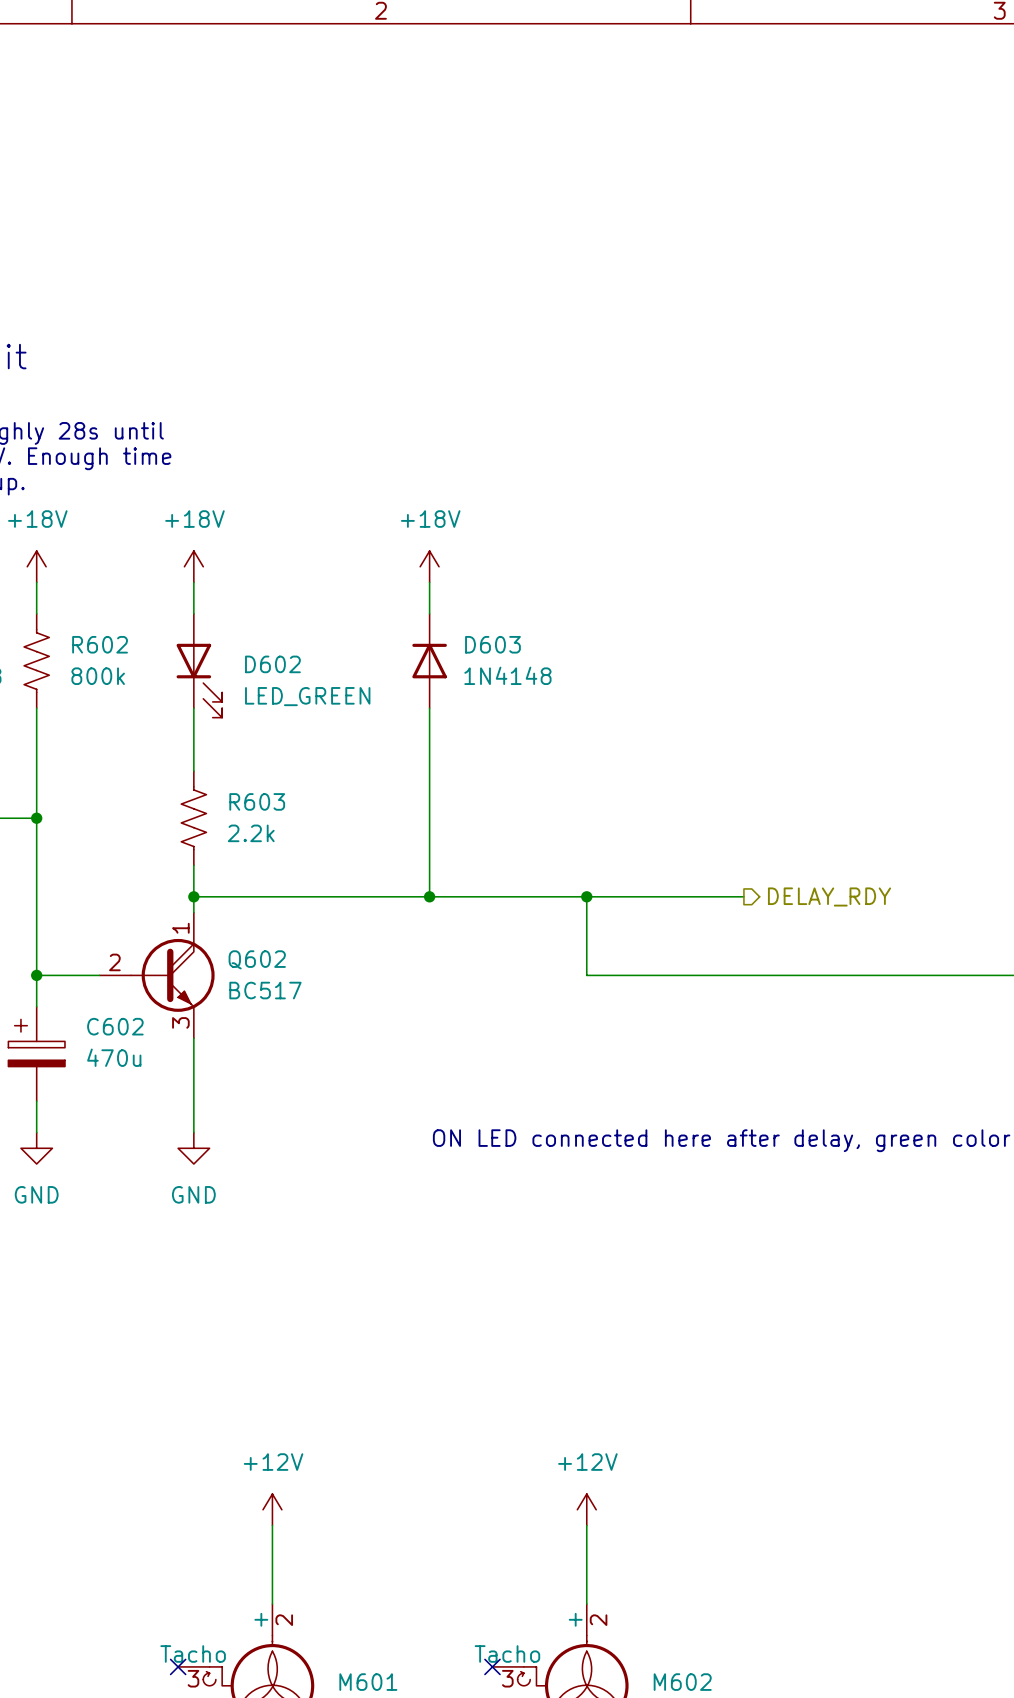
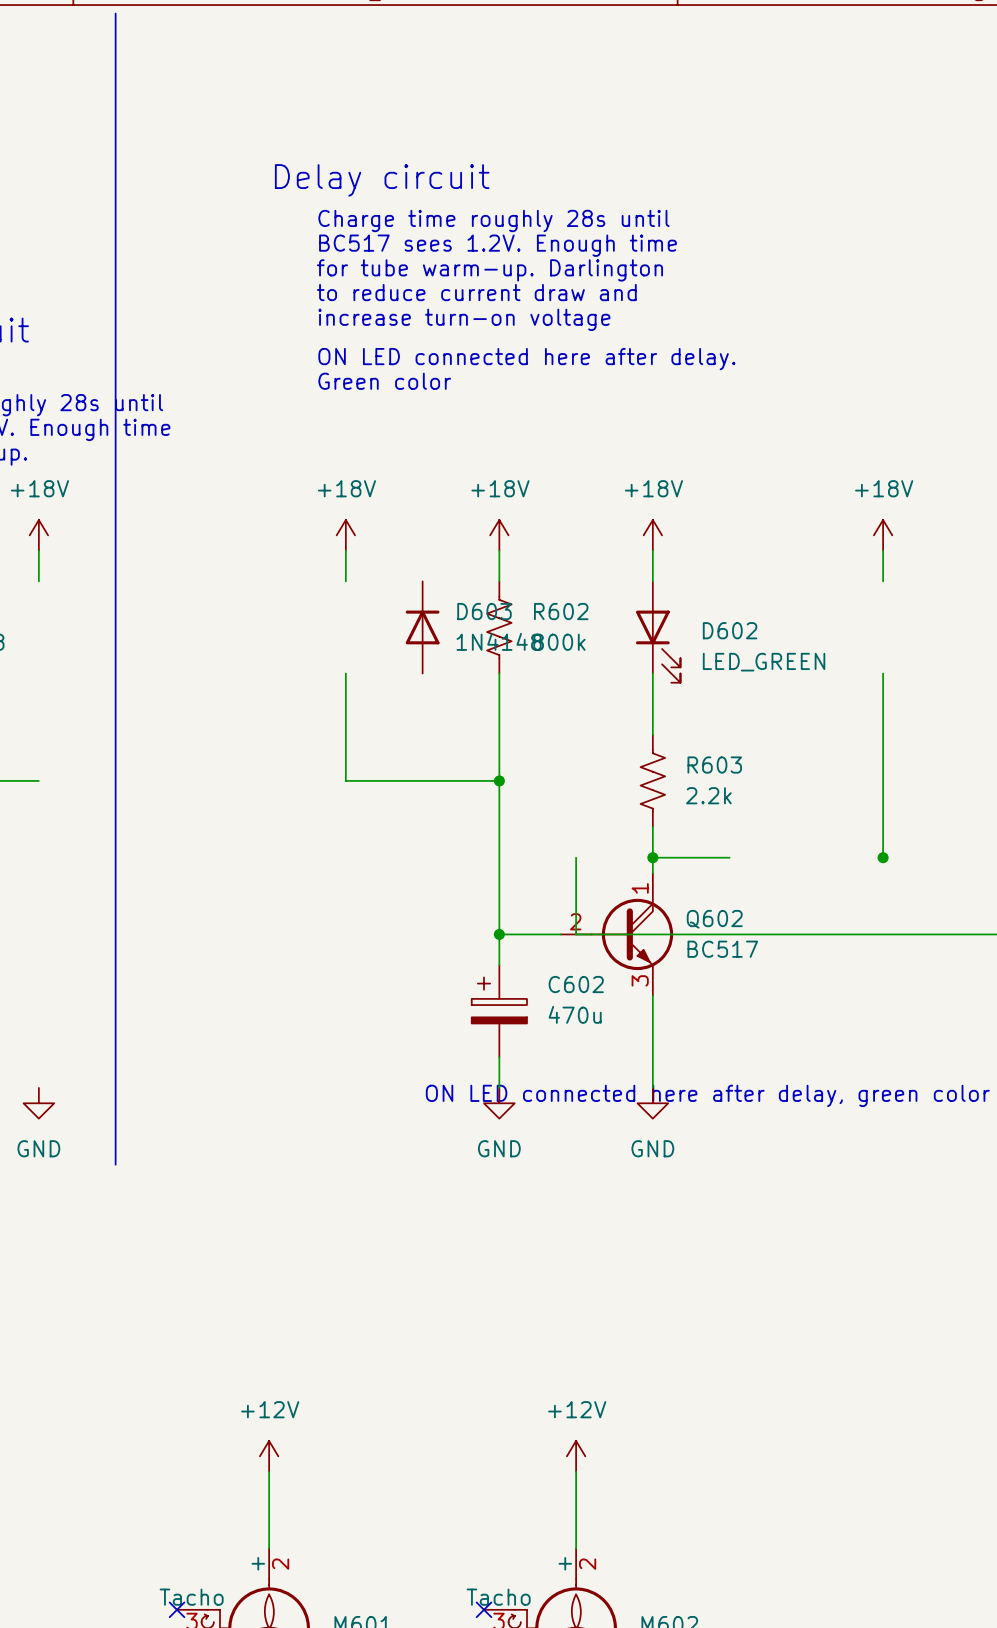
line: none -> (115, 13) (115, 1164)
text: none -> Delay circuit (382, 180)
text: none -> Charge time roughly 28s until (493, 220)
text: none -> BC517 sees 1.2V. Enough time (498, 245)
text: none -> for tube warm-up. Darlington (489, 270)
text: none -> to reduce current draw and (476, 292)
text: none -> increase turn-on voltage (464, 319)
text: none -> ON LED connected here after delay. (526, 359)
text: none -> Green color (384, 381)
power symbol: +18V (193, 566) -> none
power symbol: none -> +18V (345, 535)
power symbol: +18V (429, 566) -> none
power symbol: none -> +18V (499, 535)
power symbol: none -> +18V (652, 535)
power symbol: none -> +18V (883, 535)
wire: (193, 582) (193, 613) -> (345, 550) (345, 581)
wire: (429, 582) (429, 613) -> (499, 550) (499, 581)
wire: none -> (652, 550) (652, 581)
wire: none -> (883, 550) (883, 581)
R602 position: (36, 661) -> (499, 627)
D602 position: (199, 665) -> (658, 632)
wire: (36, 708) (36, 1006) -> none
wire: (193, 708) (193, 771) -> none
wire: none -> (345, 673) (345, 780) (499, 780)
wire: (429, 708) (429, 896) -> none
wire: none -> (499, 673) (499, 965)
wire: none -> (652, 673) (652, 734)
wire: none -> (883, 673) (883, 857)
junction: (36, 818) -> none
R603 position: (193, 818) -> (652, 780)
junction: none -> (499, 780)
wire: (193, 865) (193, 912) -> none
wire: none -> (652, 827) (652, 873)
wire: (193, 896) (665, 896) -> none
junction: (193, 896) -> none
junction: (429, 896) -> none
junction: (586, 896) -> none
junction: none -> (652, 857)
hierarchical label: DELAY_RDY (829, 896) -> none
junction: none -> (883, 857)
wire: (36, 975) (99, 975) -> none
junction: (36, 975) -> none
Q602 position: (157, 975) -> (616, 934)
wire: none -> (499, 934) (560, 934)
junction: none -> (499, 934)
wire: (193, 1038) (193, 1132) -> none
wire: none -> (652, 995) (652, 1087)
C602 position: (36, 1053) -> (499, 1011)
wire: (36, 1101) (36, 1132) -> none
wire: none -> (499, 1057) (499, 1087)
power symbol: GND (193, 1148) -> none
power symbol: none -> GND (499, 1103)
power symbol: none -> GND (652, 1103)

